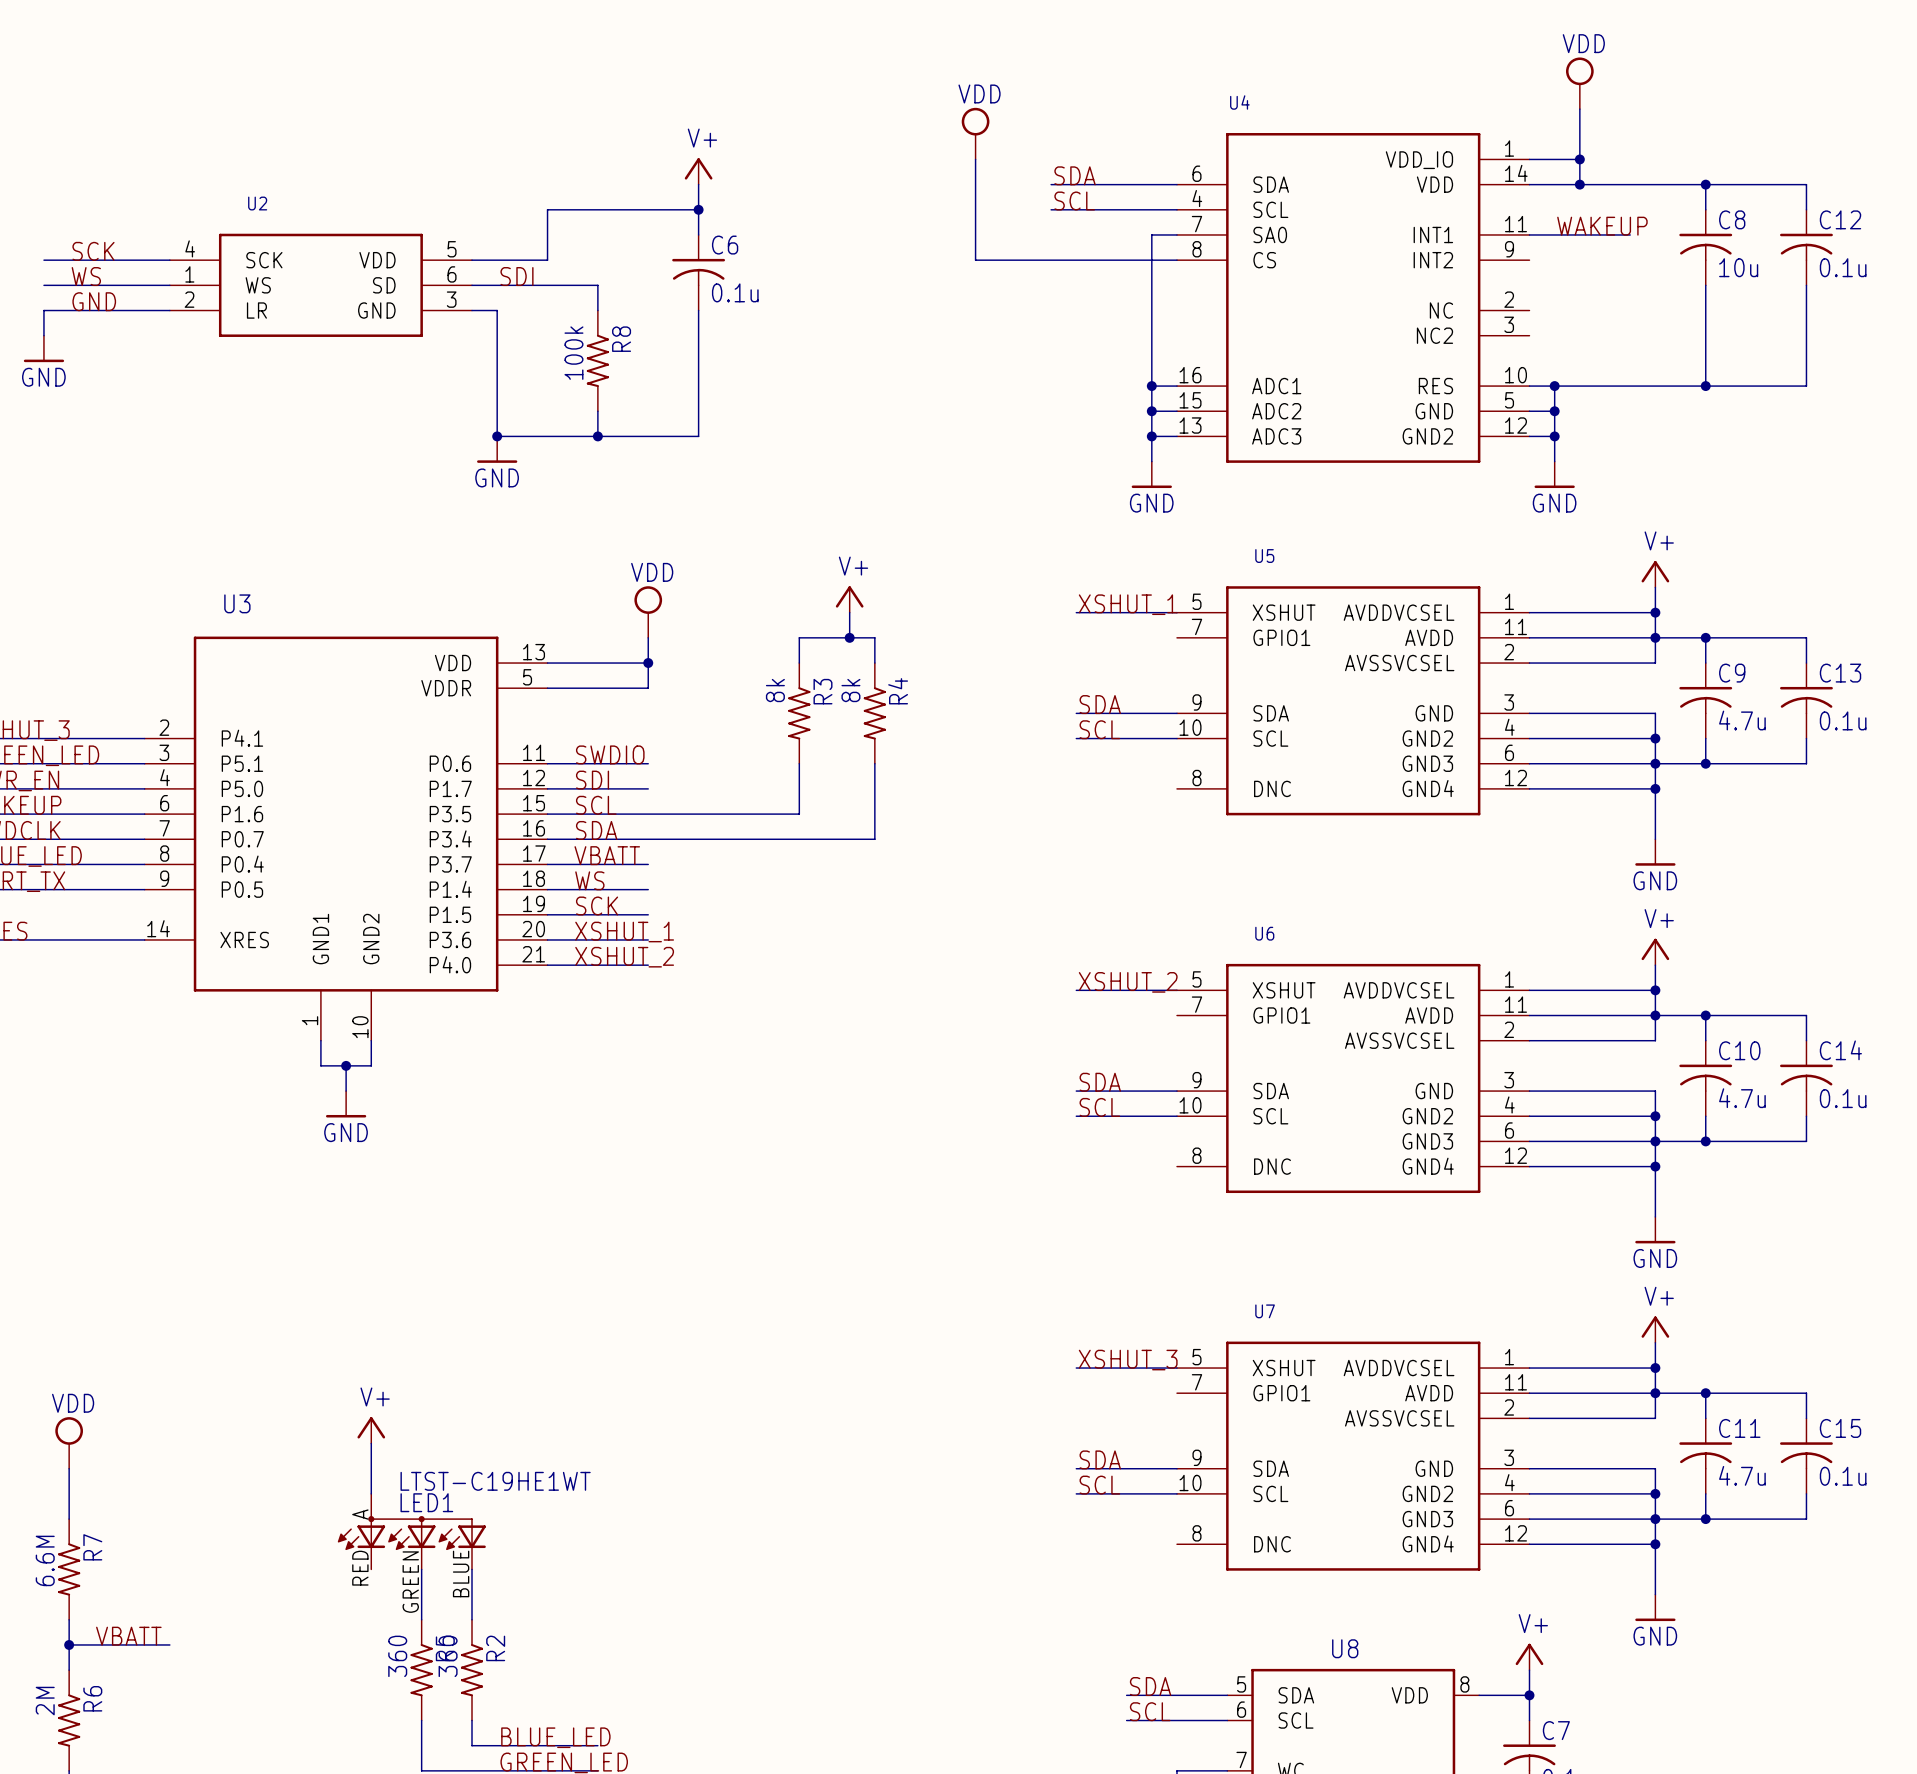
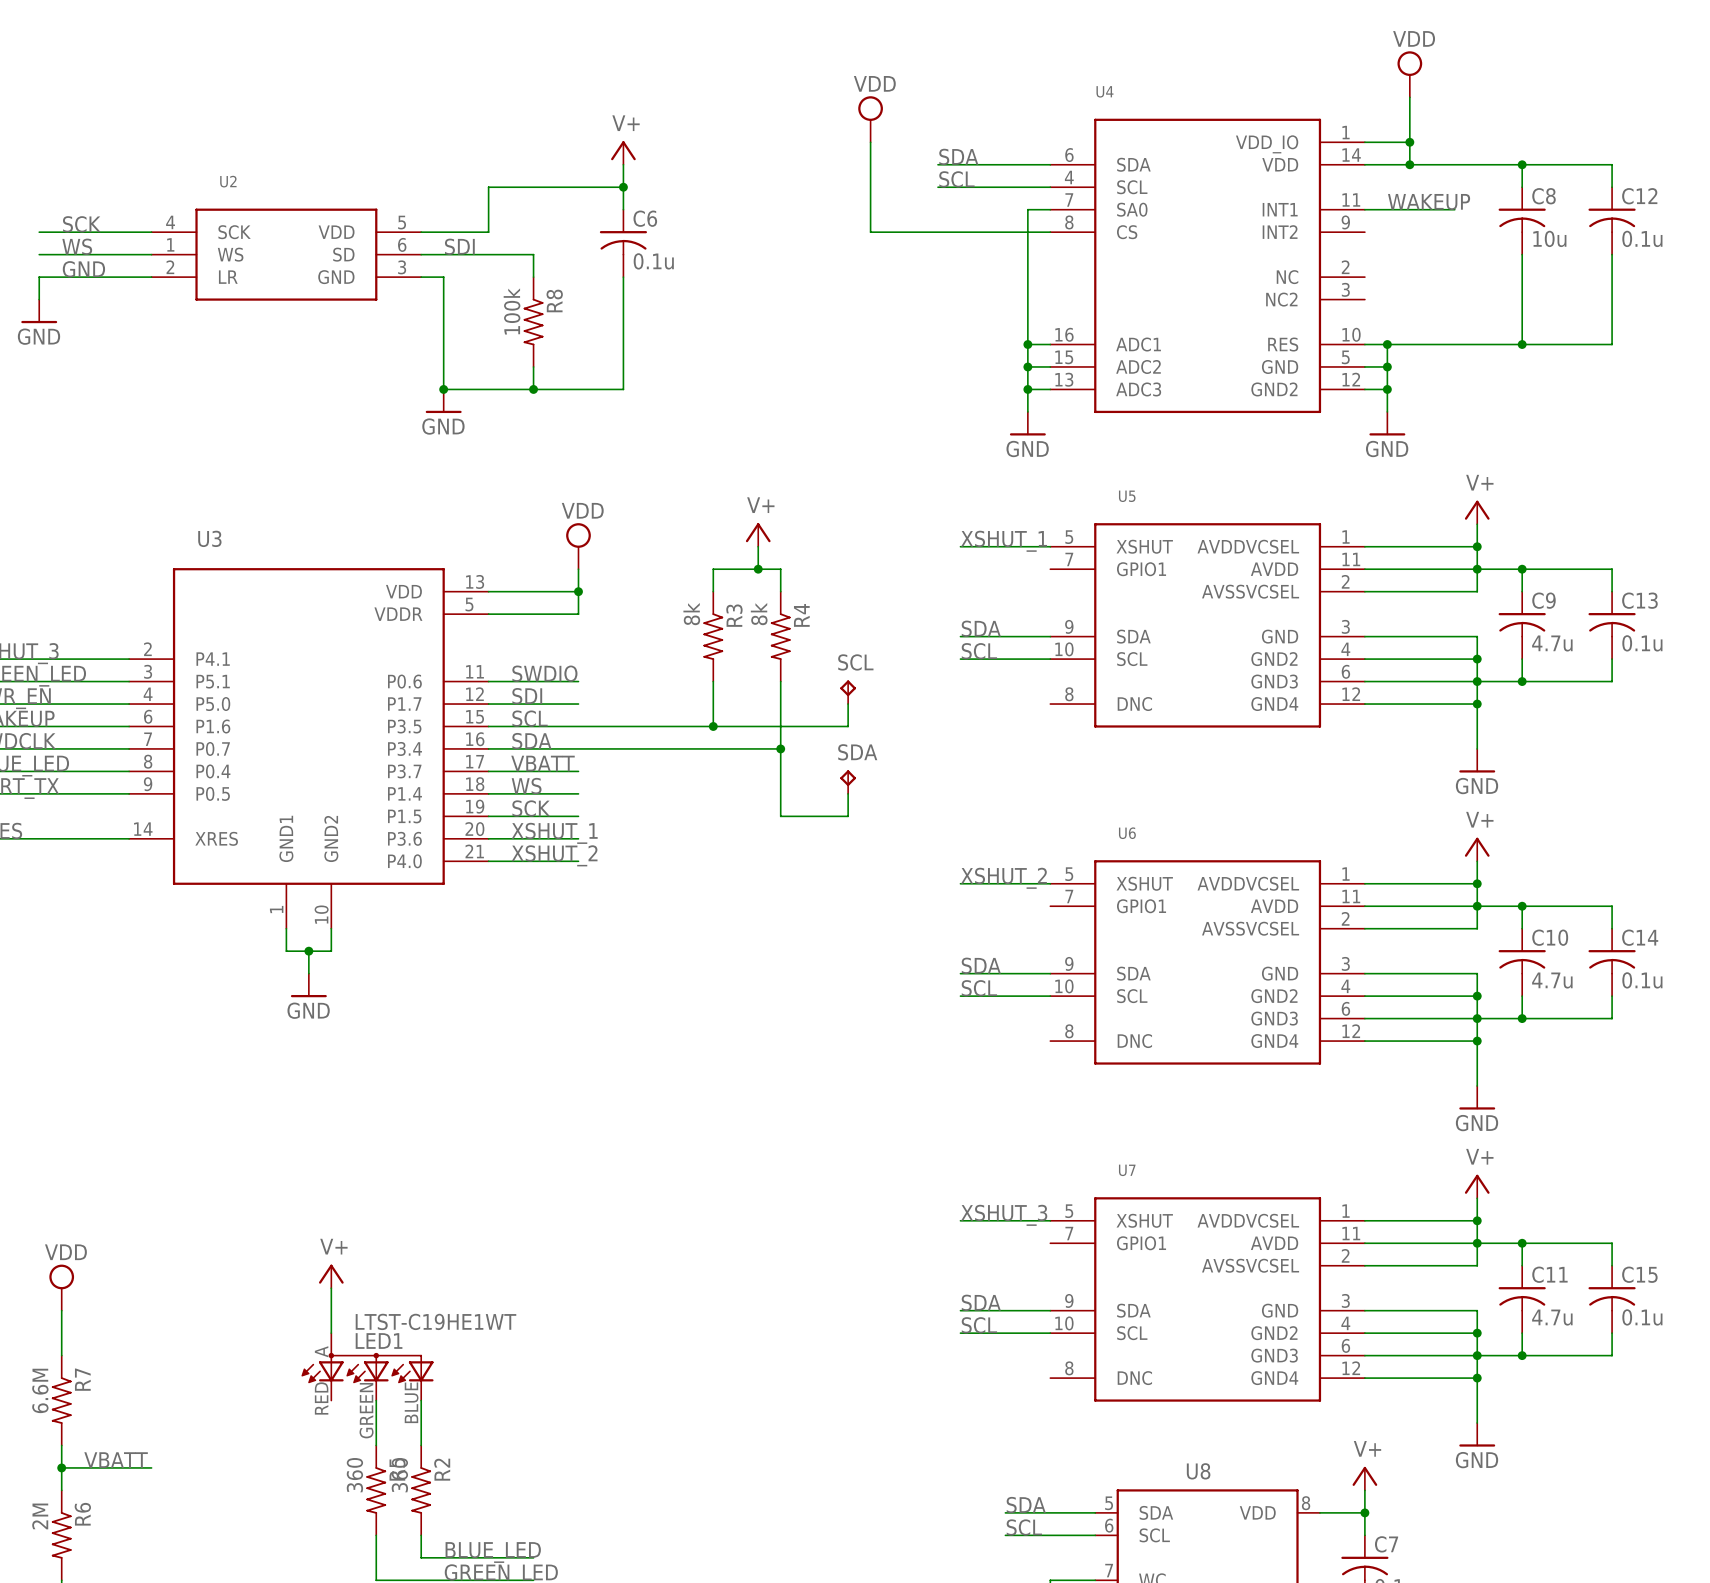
SCL: none -> (848, 692)
wire: none -> (848, 704) (848, 726) (713, 726)
junction: none -> (713, 726)
wire: none -> (780, 748) (780, 816) (848, 816) (848, 793)
junction: none -> (780, 748)
SDA: none -> (848, 782)

